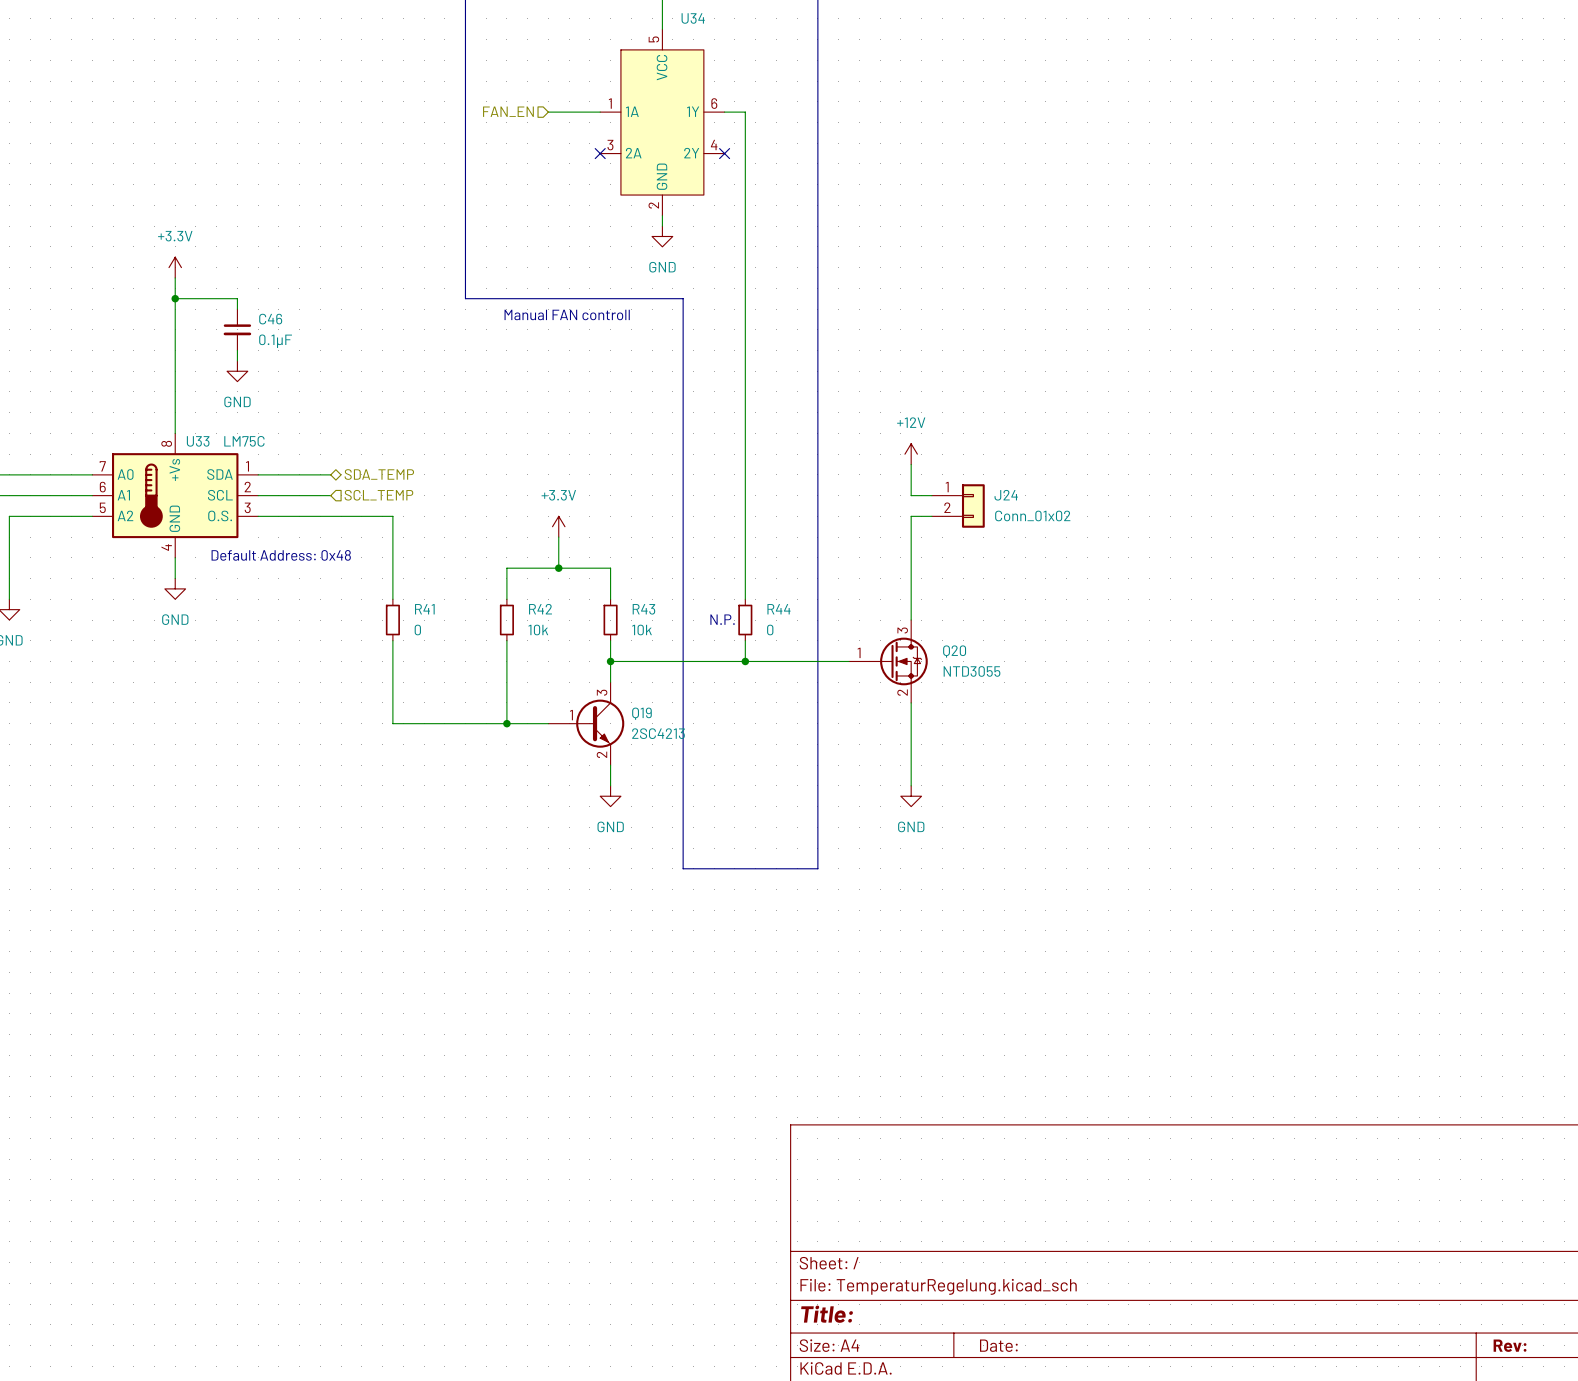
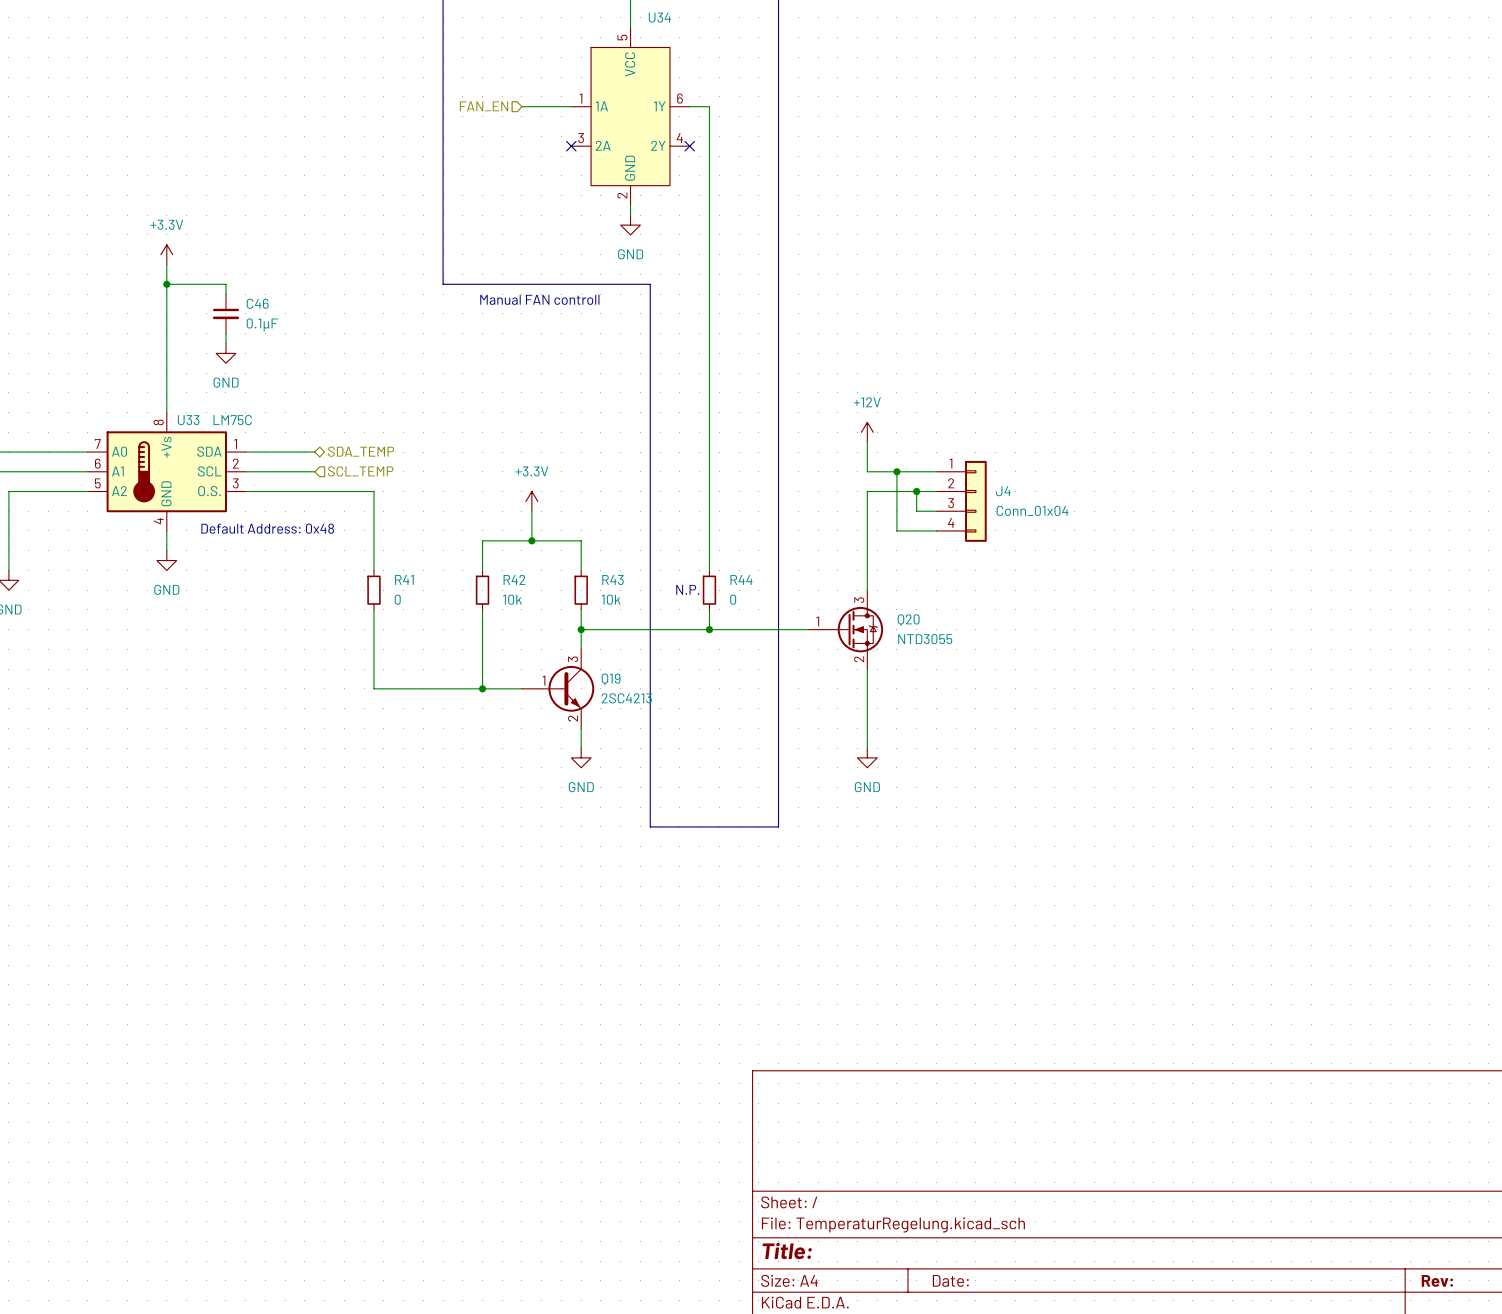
wire: none -> (896, 471) (896, 530) (936, 530)
junction: none -> (896, 471)
J24: Conn_01x02 (958, 505) -> none
wire: none -> (916, 491) (916, 511) (936, 511)
junction: none -> (916, 491)
J4: none -> Conn_01x04 (961, 501)

